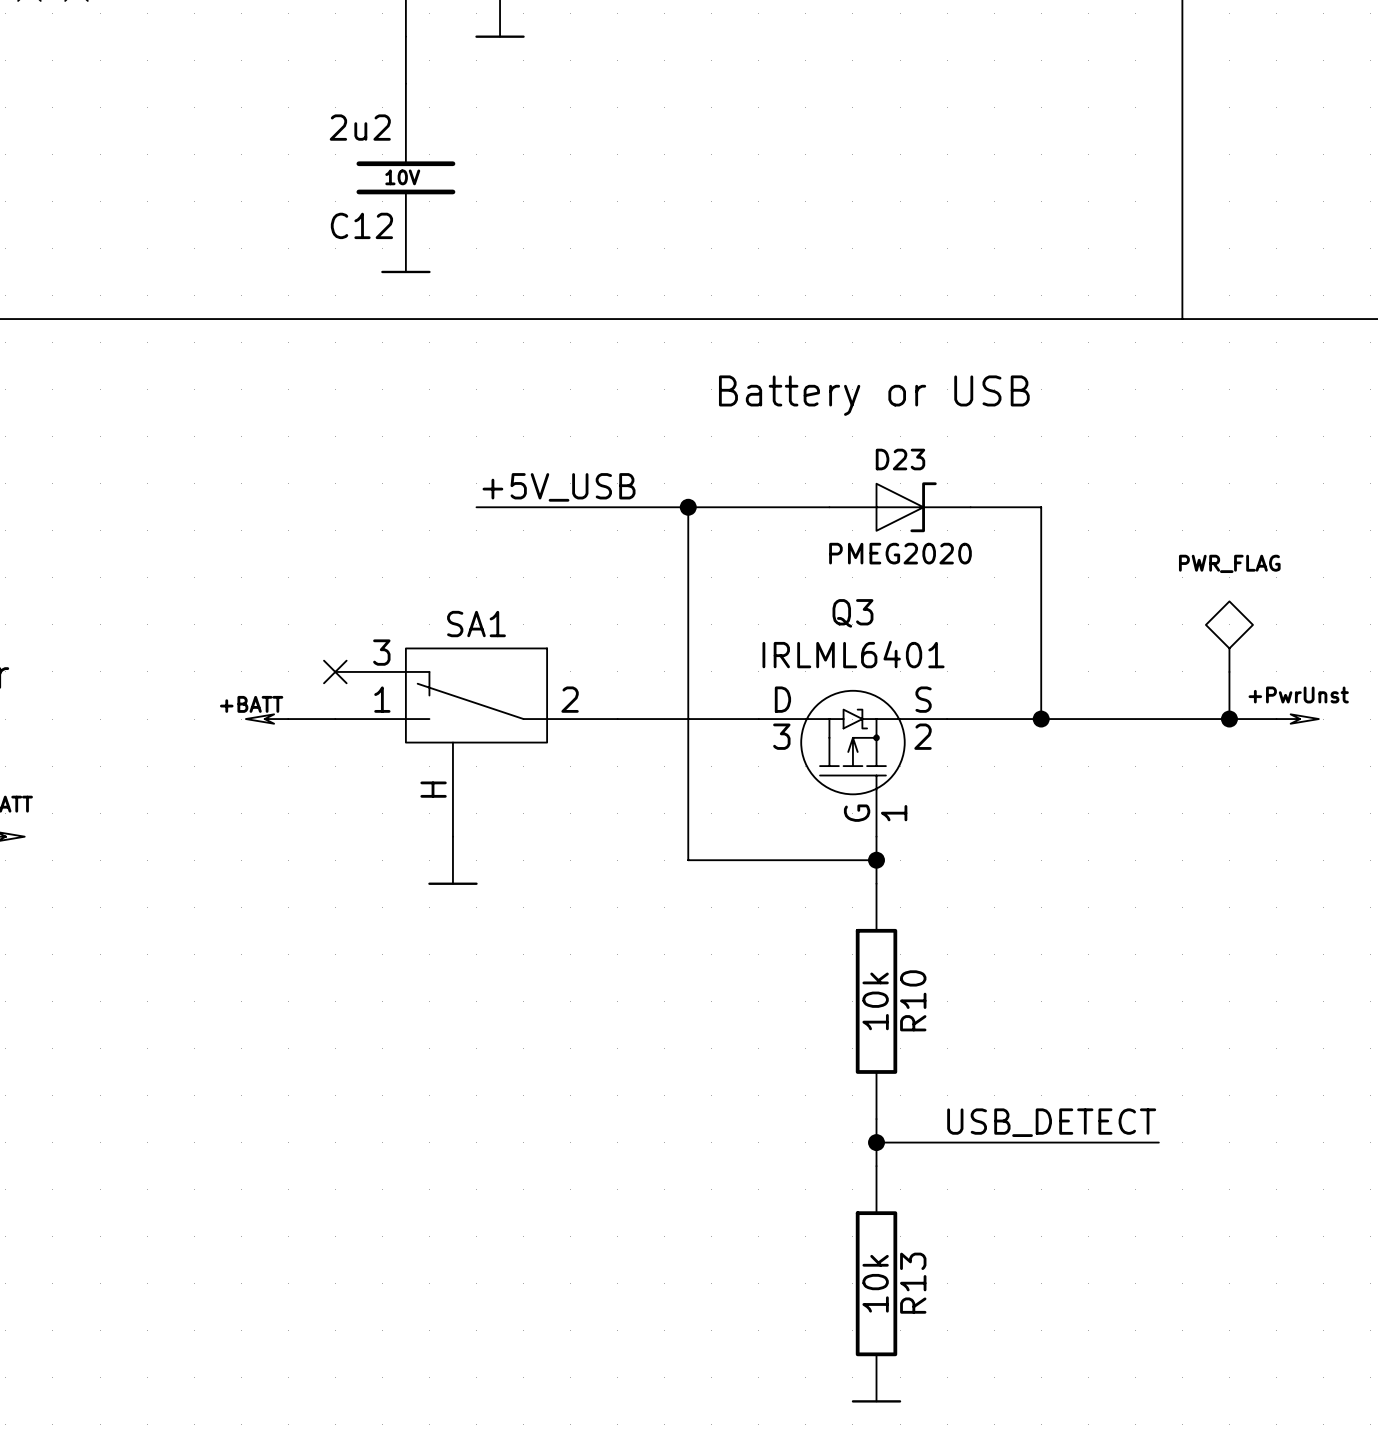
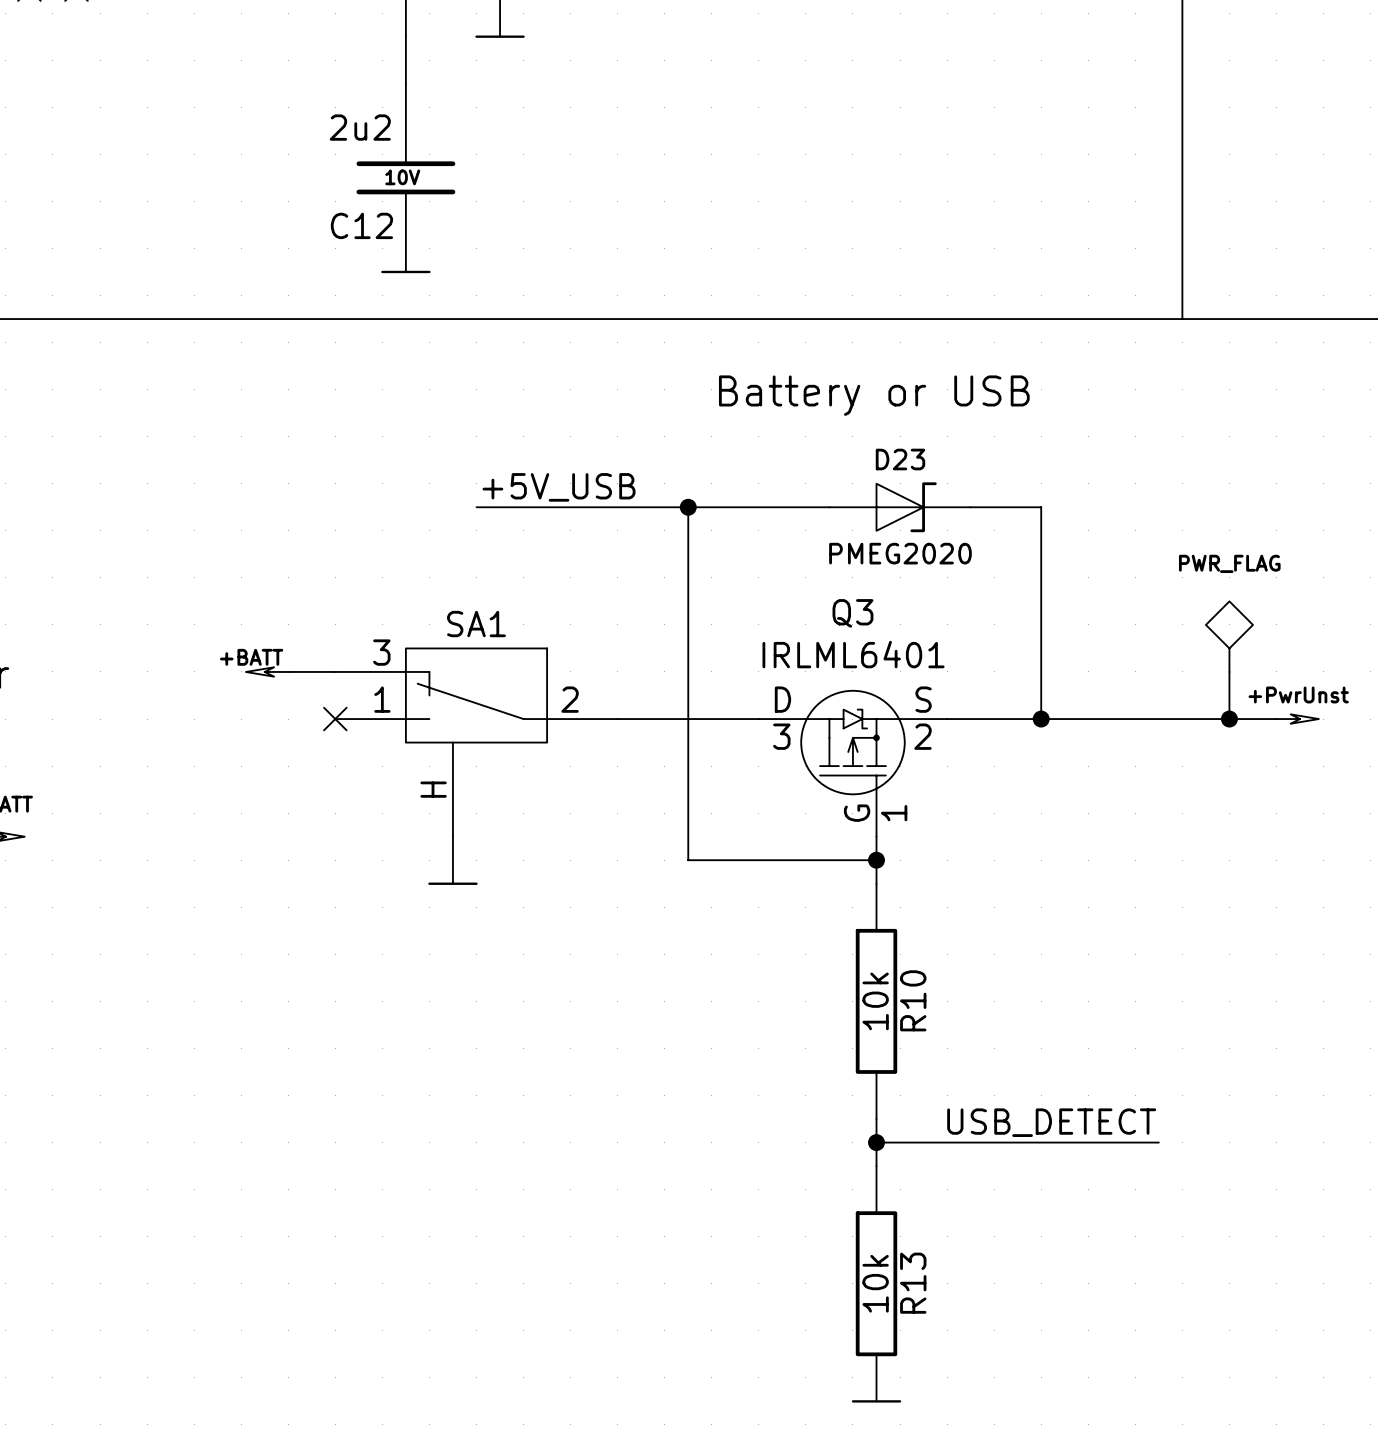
no-connect mark position: (335, 671) -> (335, 719)
power symbol position: +BATT (267, 719) -> +BATT (267, 671)
wire: (288, 719) (335, 719) -> (288, 671) (335, 671)

